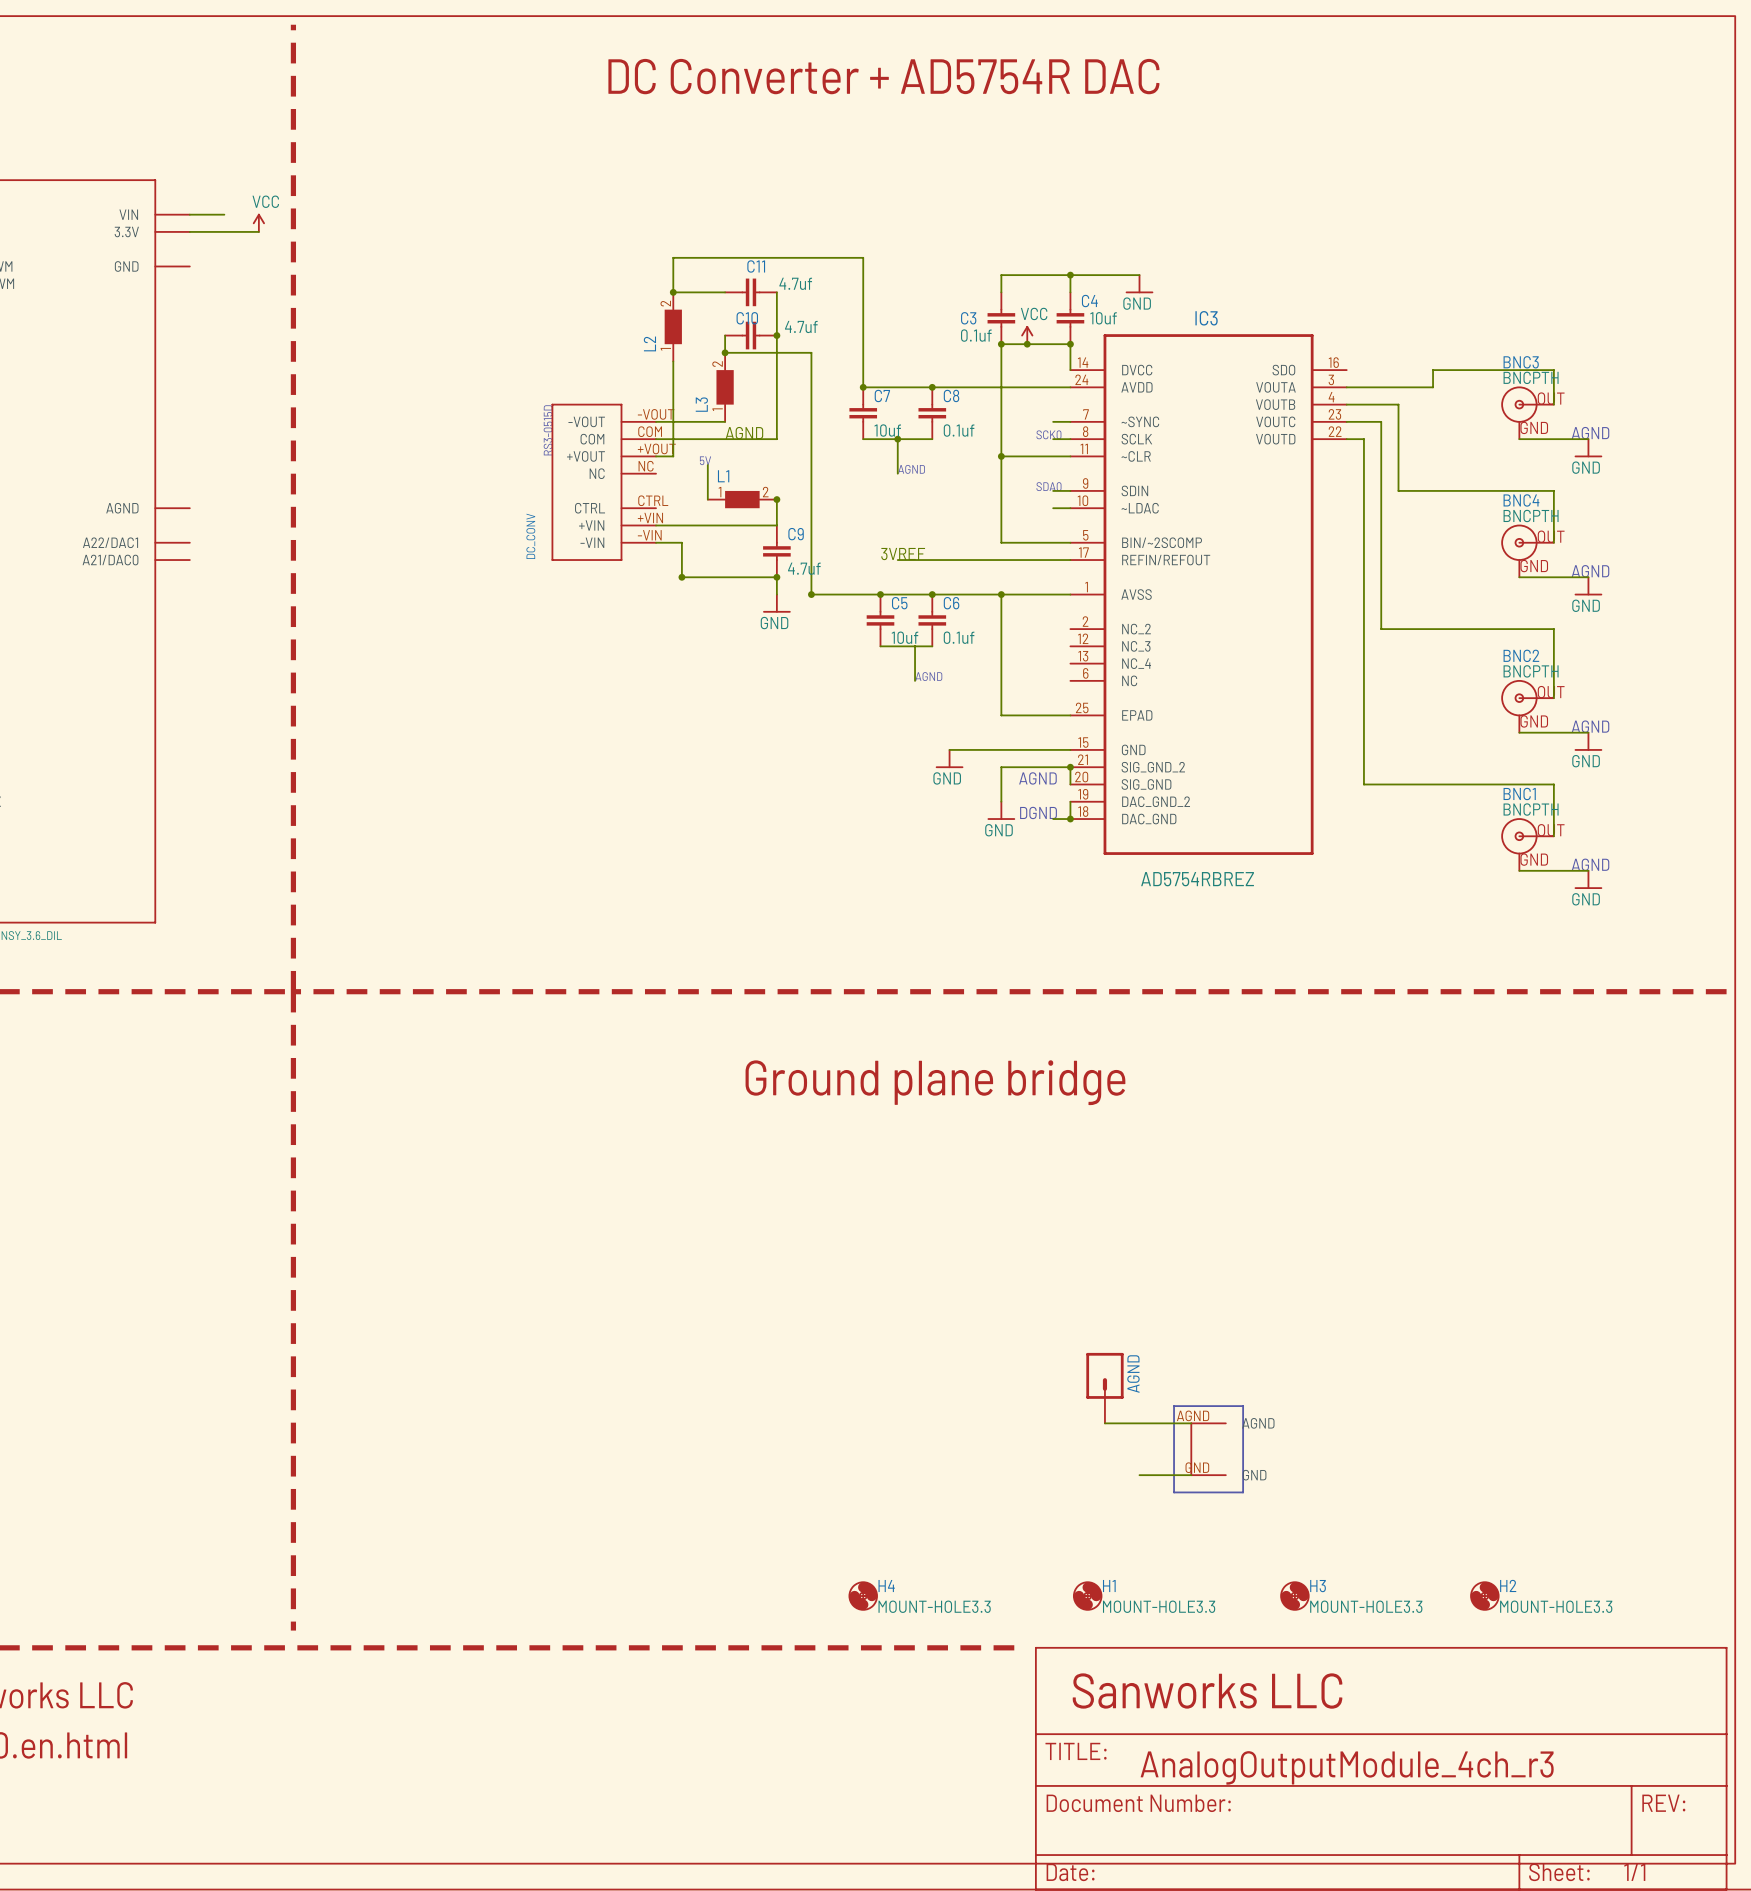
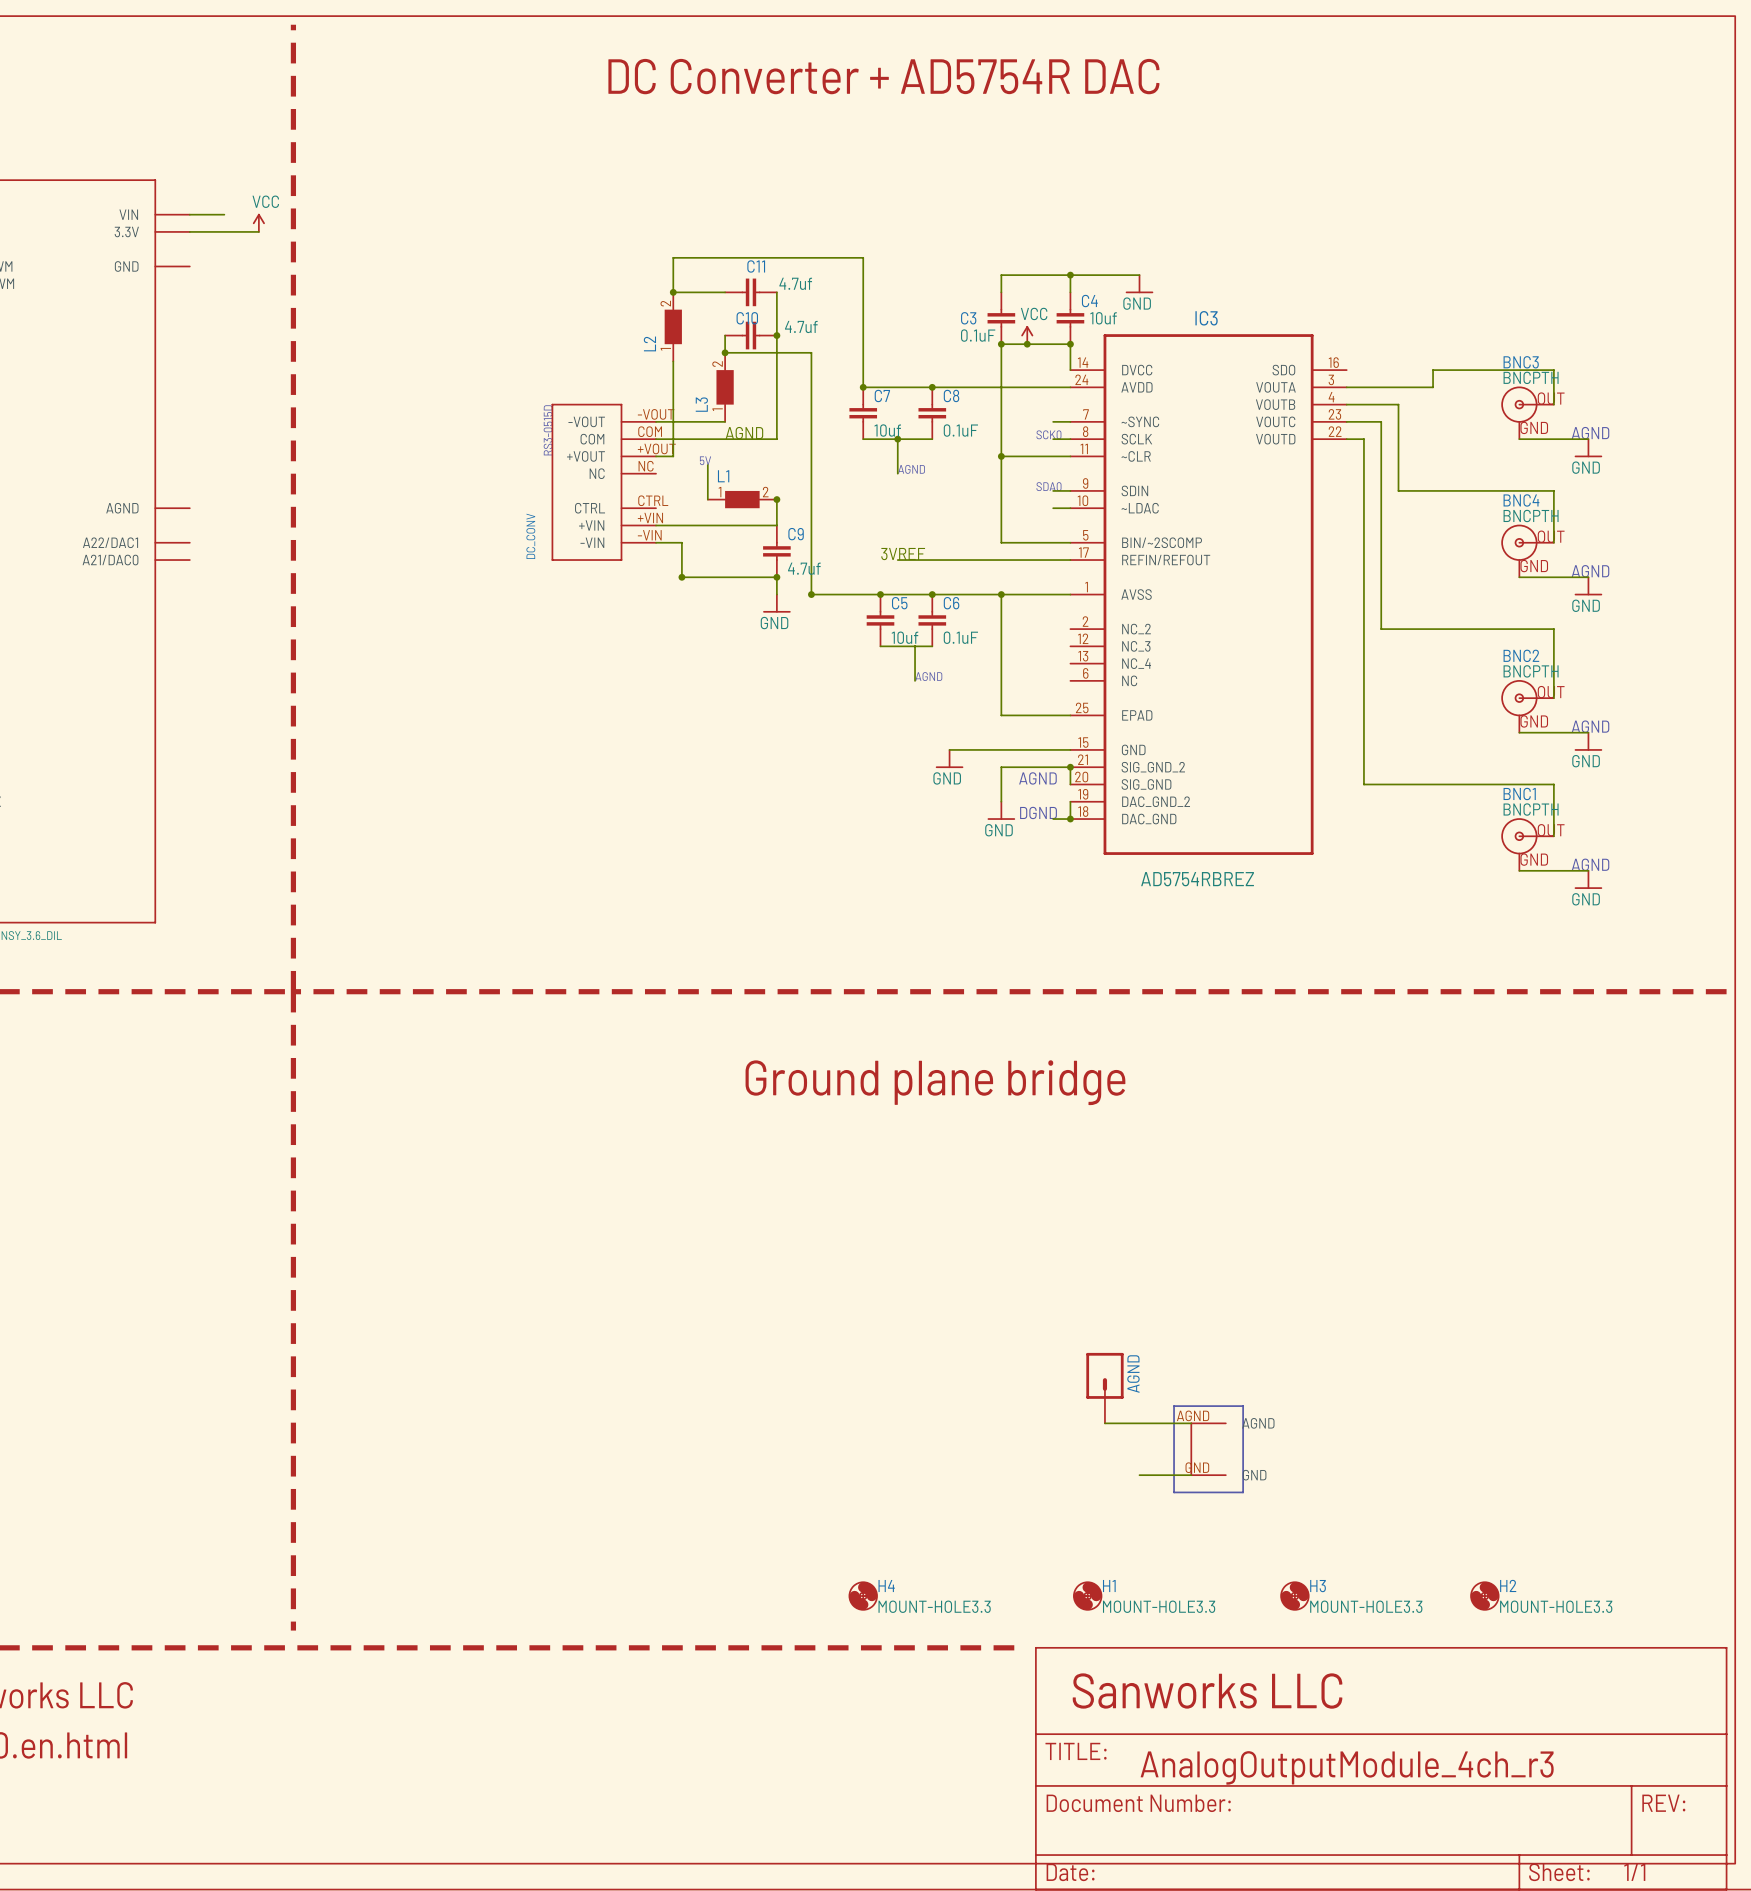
C3 value: 0.1uf (976, 335) -> 0.1uF (978, 335)
C8 value: 0.1uf (959, 430) -> 0.1uF (960, 430)
C6 value: 0.1uf (959, 637) -> 0.1uF (960, 637)

